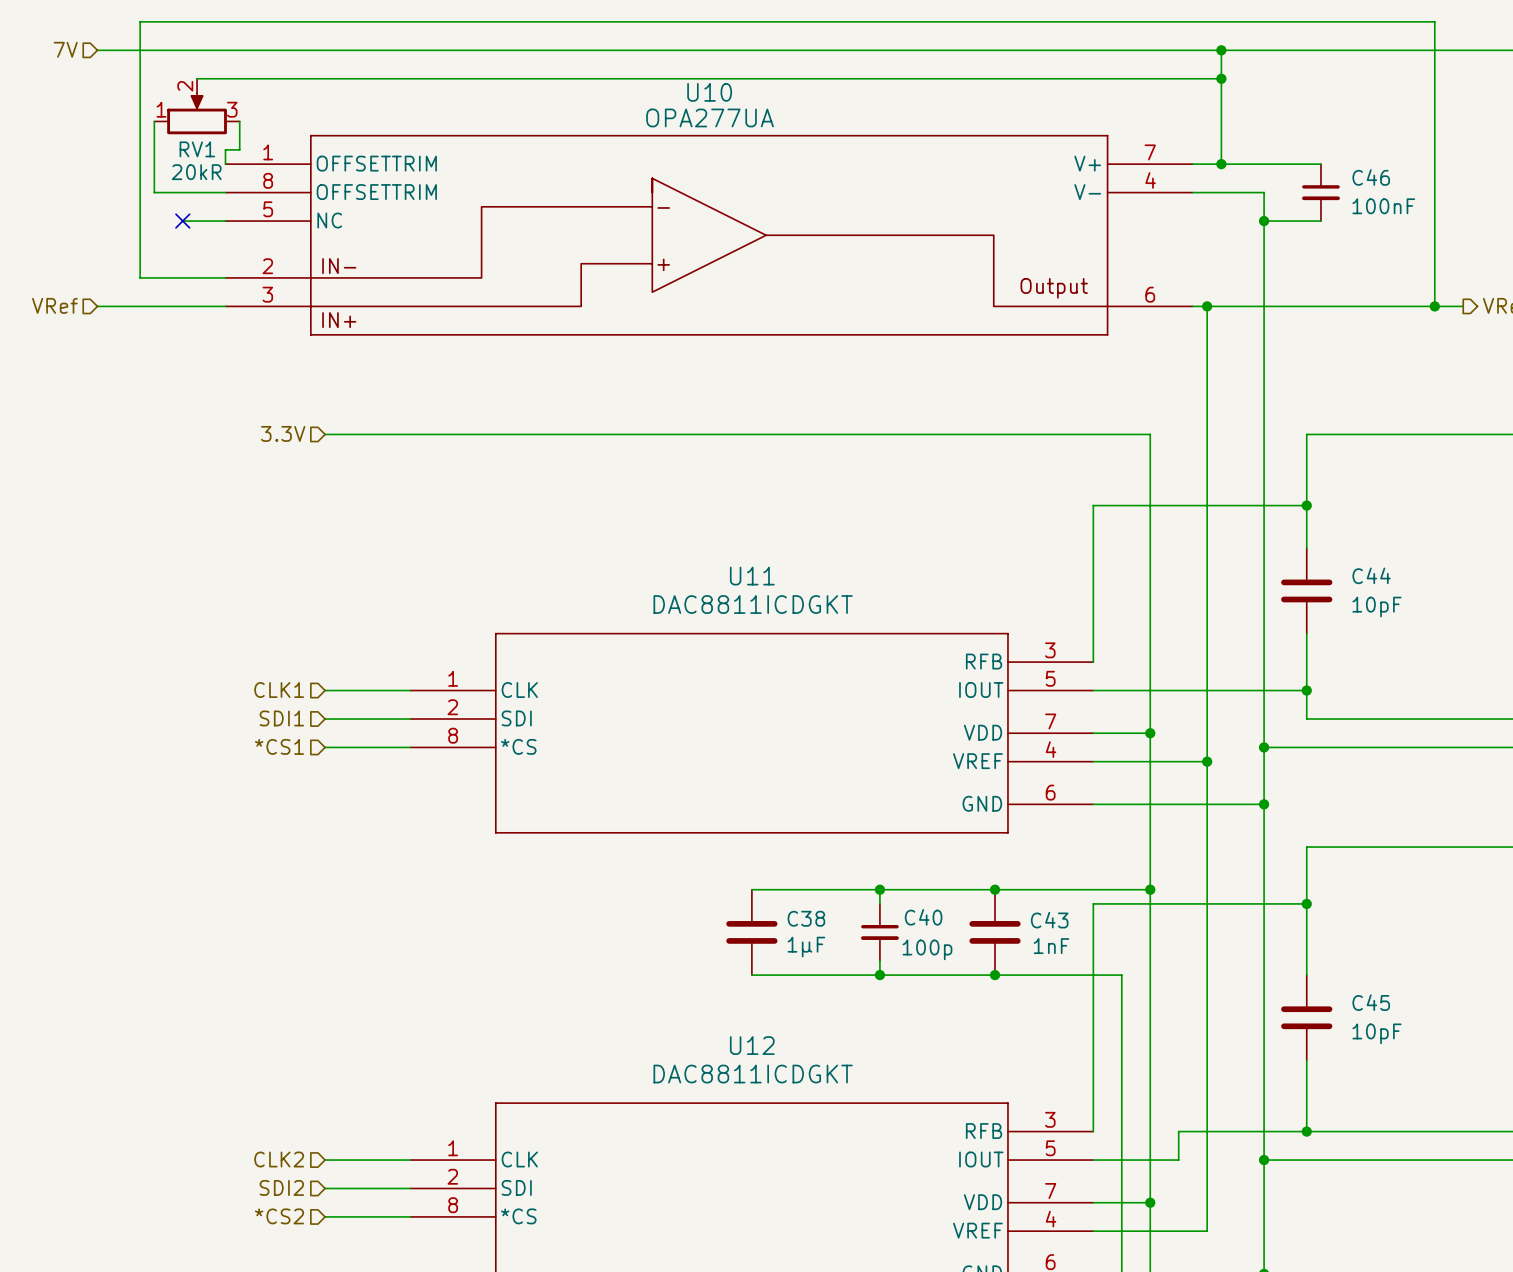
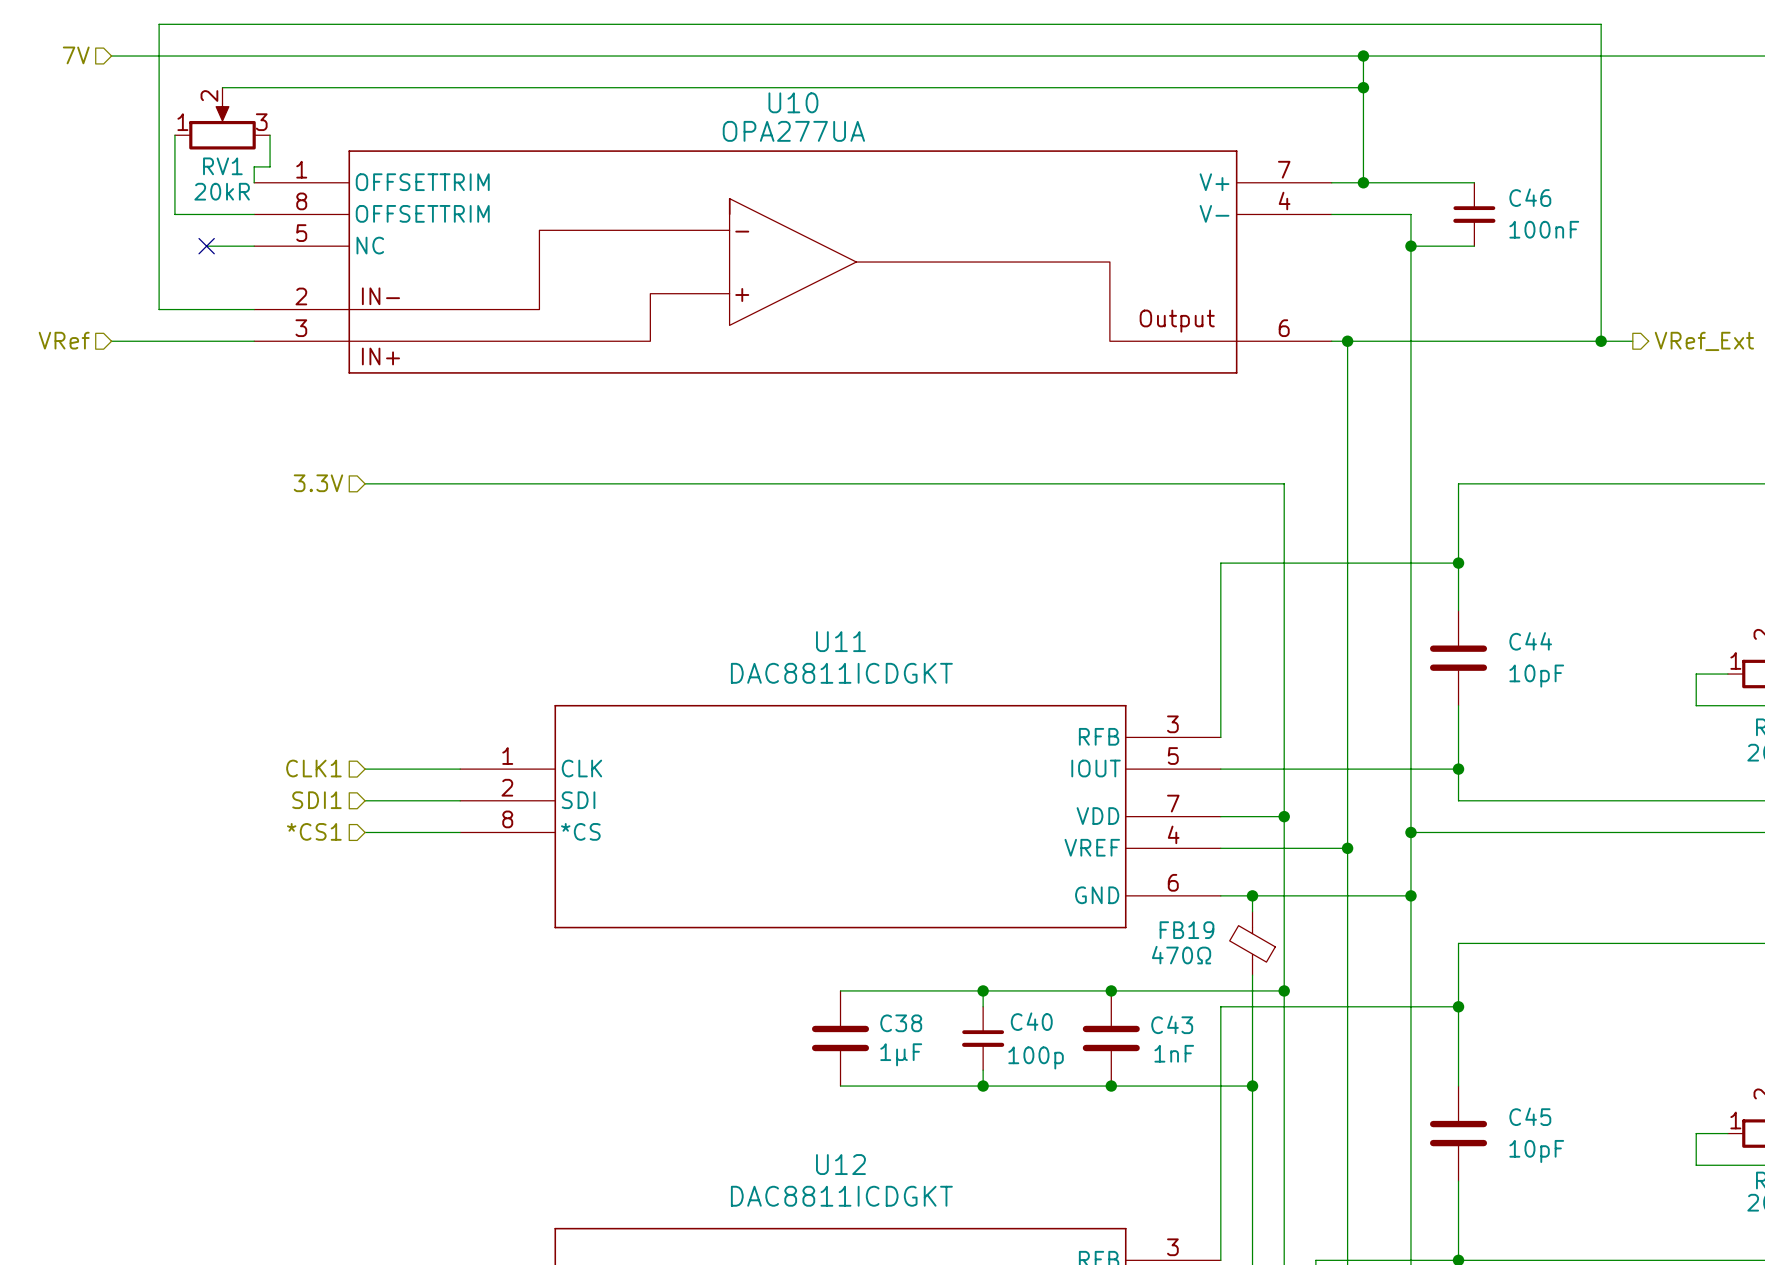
wire: none -> (1252, 895) (1252, 911)
junction: none -> (1252, 895)
FB19: none -> 470Ω (1252, 943)
wire: none -> (1252, 975) (1252, 1086)
junction: none -> (1252, 1086)

